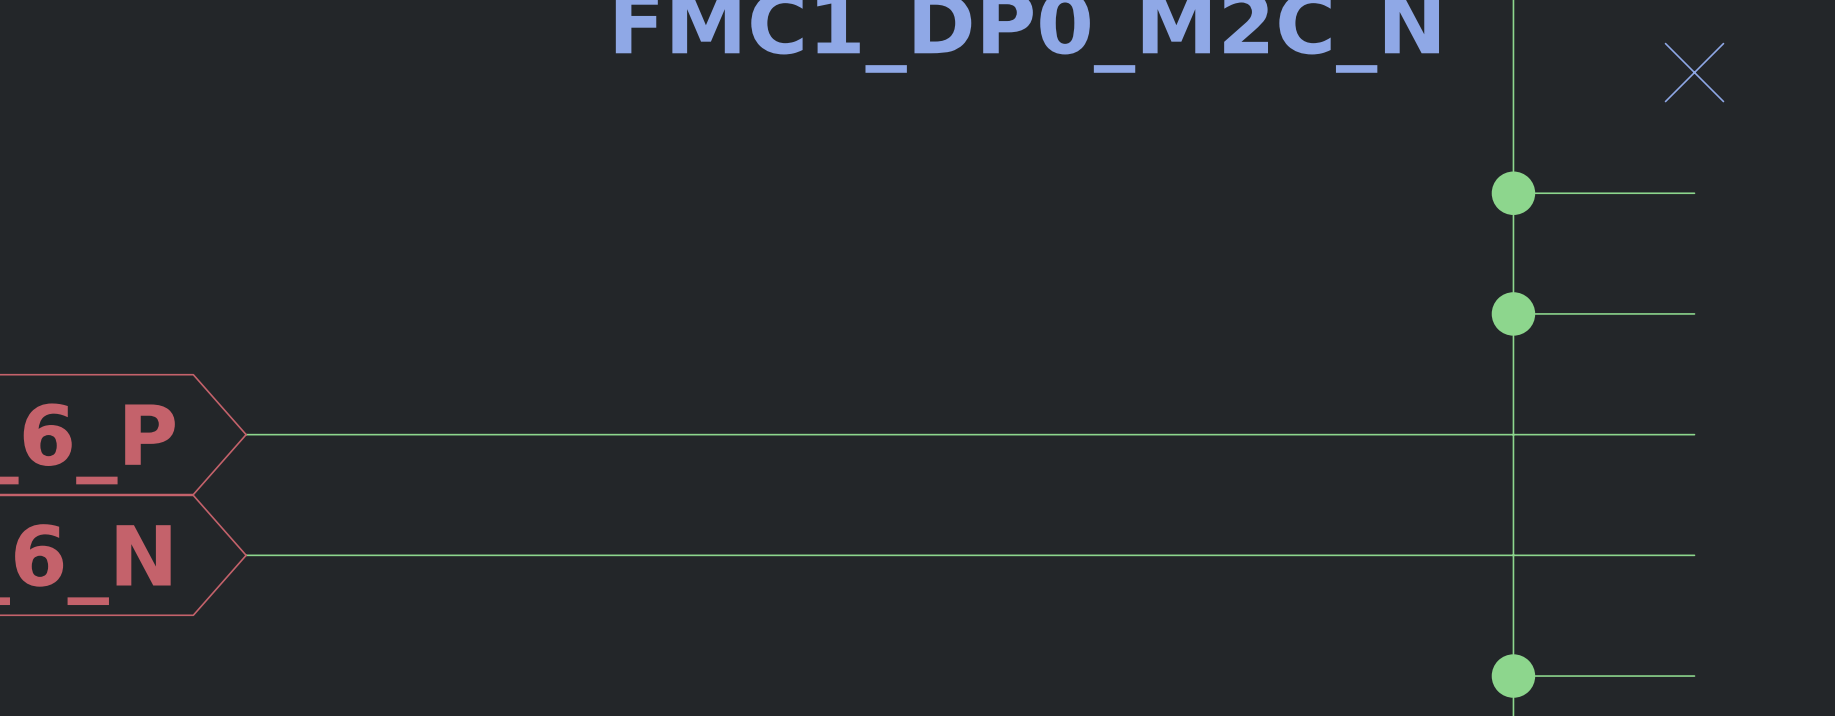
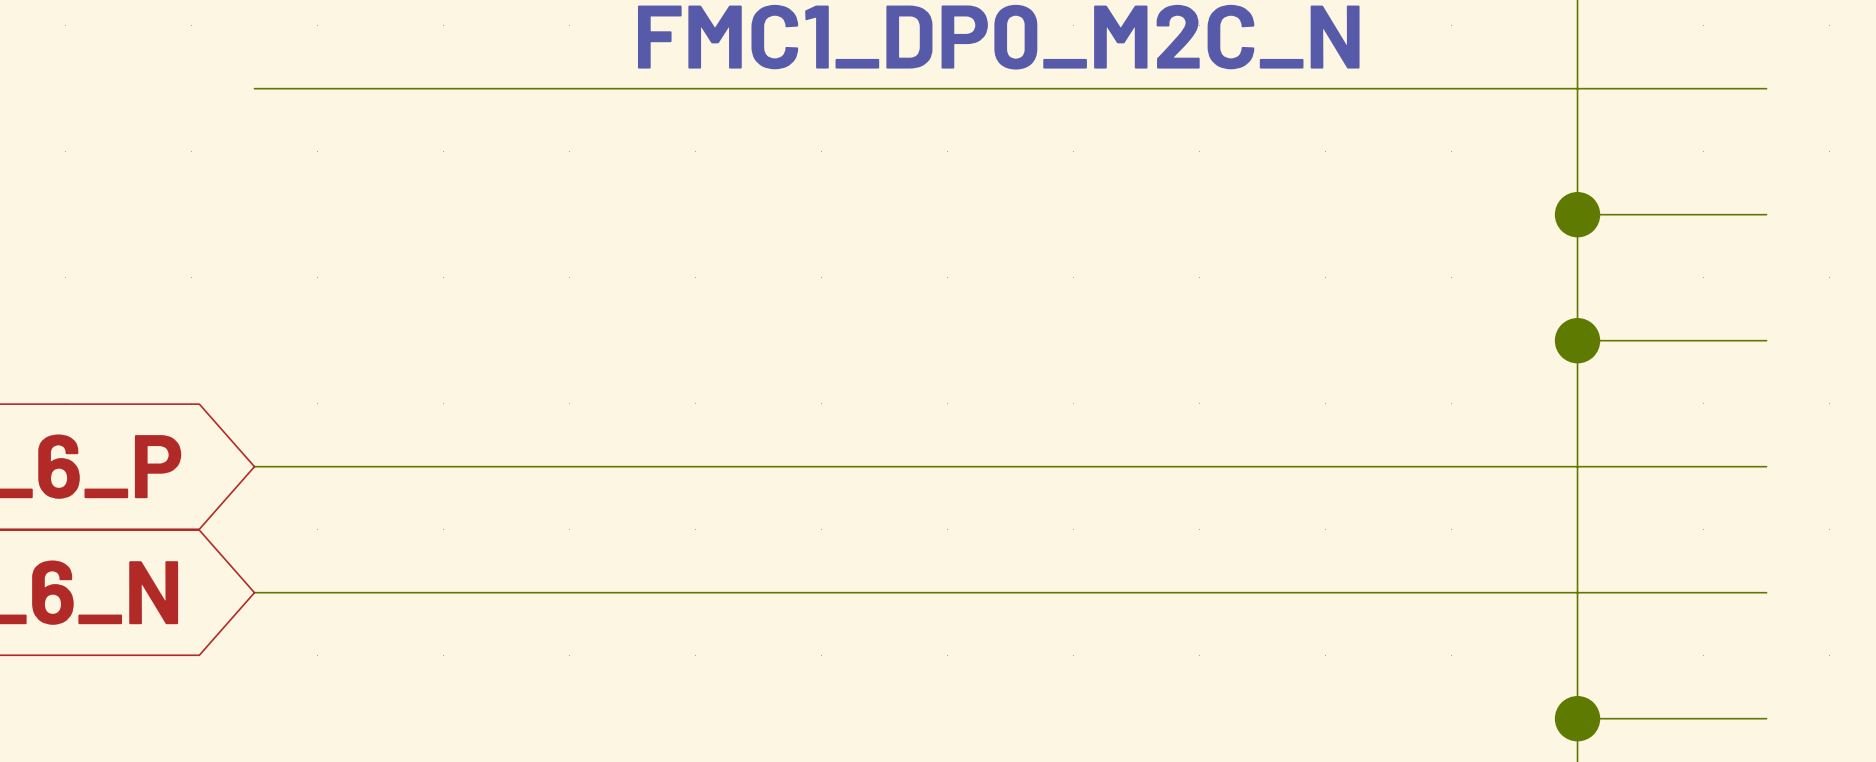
wire: none -> (254, 88) (1766, 88)
no-connect mark: (1694, 72) -> none

